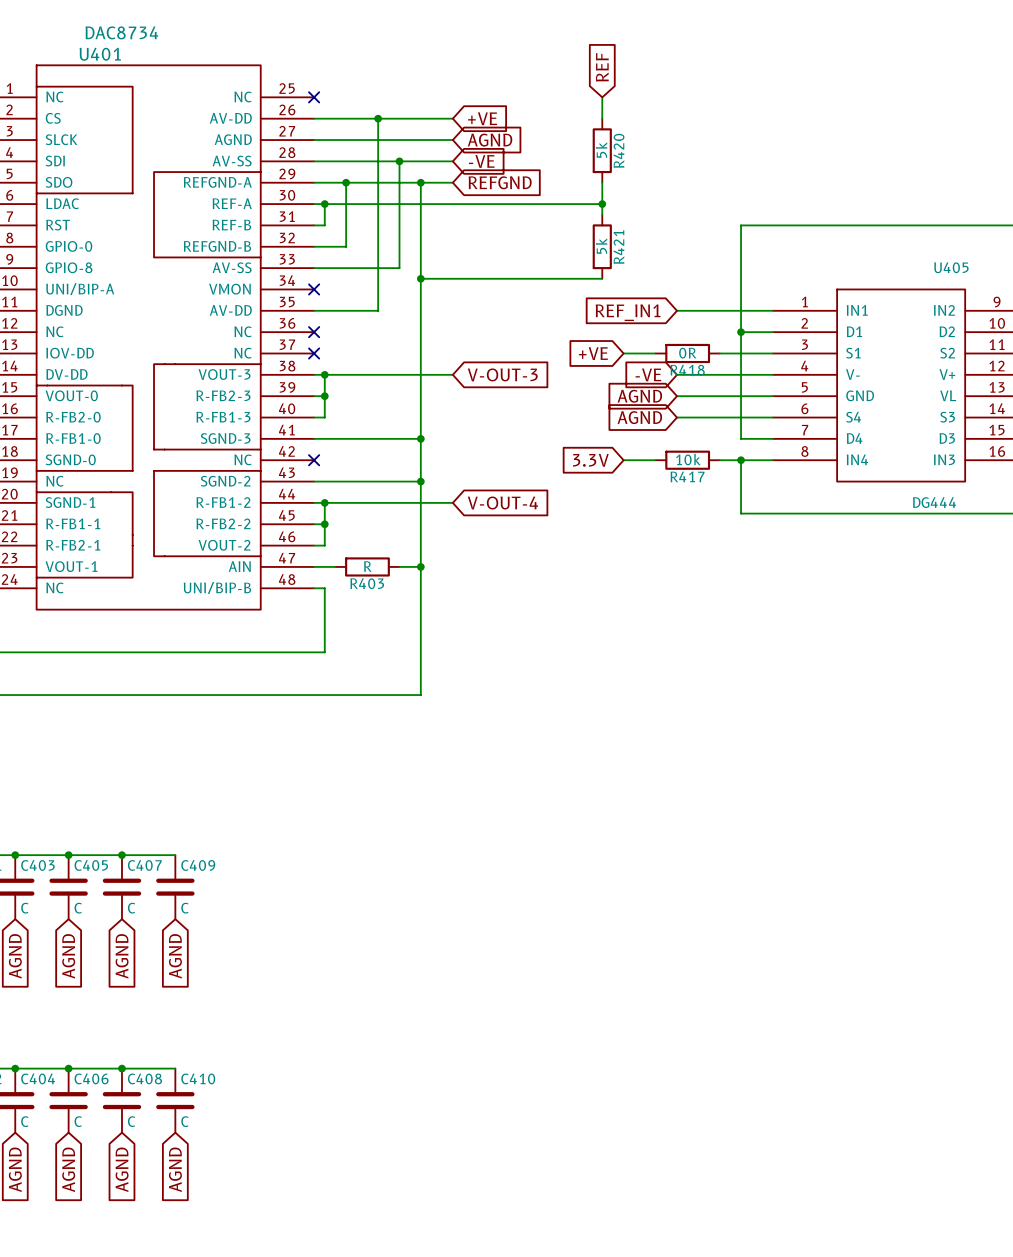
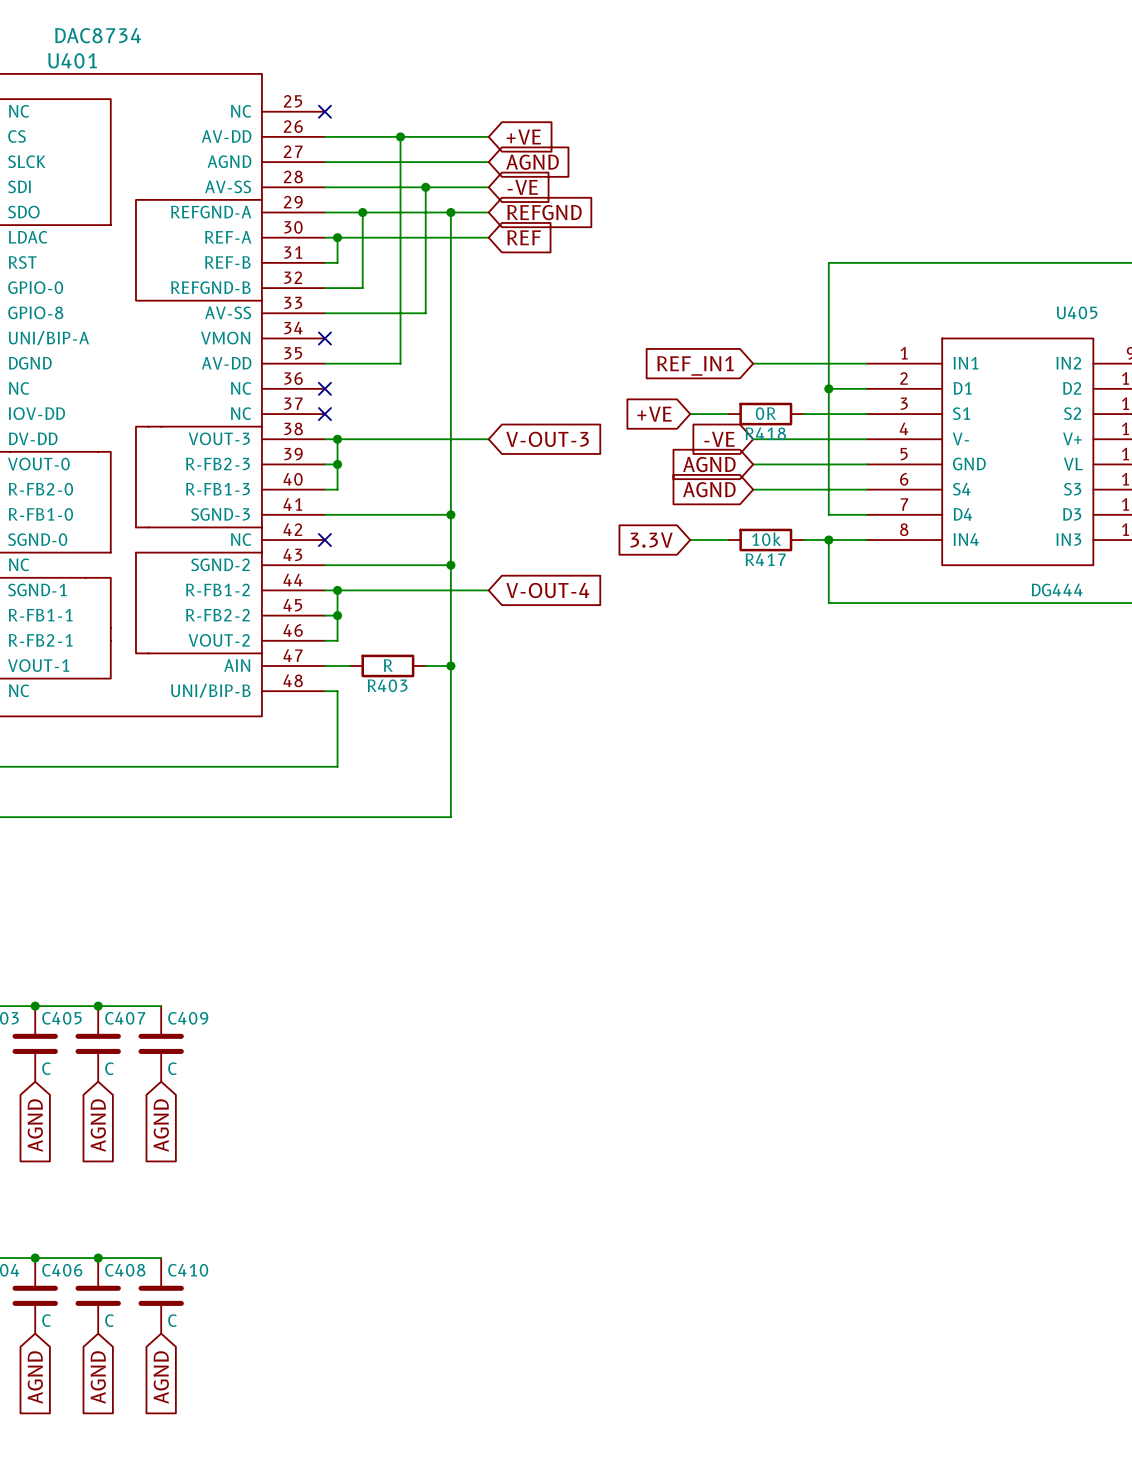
global label rotation: 0° (602, 67) -> 90° clockwise (524, 237)
global label position: REF (602, 67) -> REF (524, 237)
wire: (602, 97) (602, 118) -> none
R420: 5k (602, 150) -> none
wire: (602, 182) (602, 214) -> none
wire: (452, 204) (602, 204) -> none
junction: (602, 204) -> none
R421: 5k (602, 246) -> none
wire: (420, 278) (602, 278) -> none
junction: (420, 278) -> none

